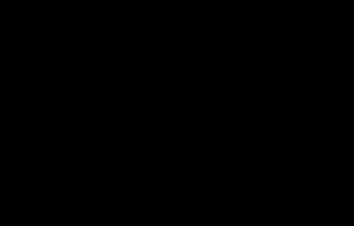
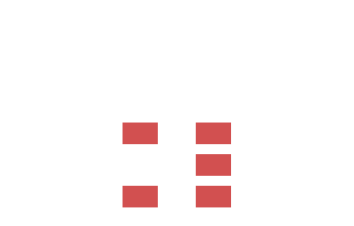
part: none -> (176, 164)

